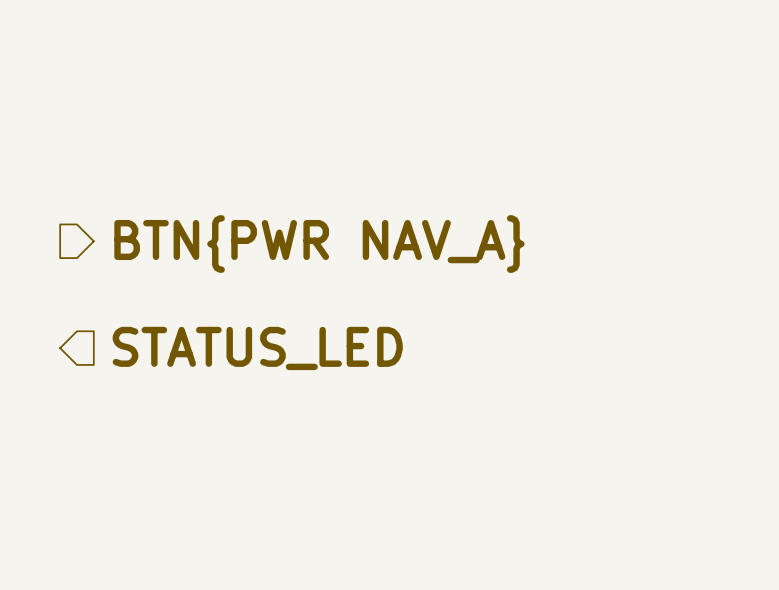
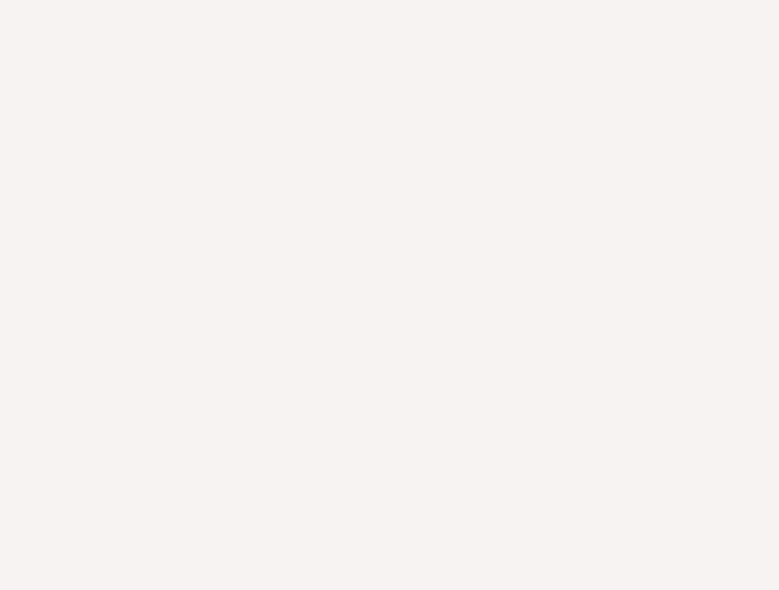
hierarchical label: BTN{PWR NAV_A} (319, 244) -> none
hierarchical label: STATUS_LED (257, 348) -> none

